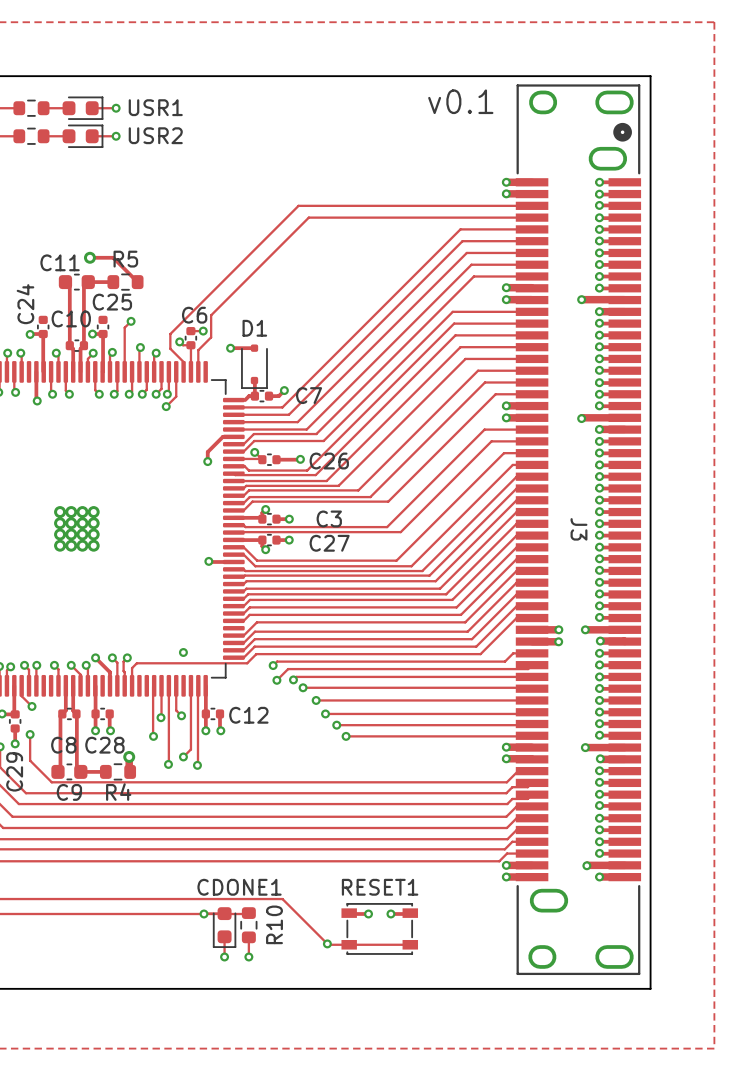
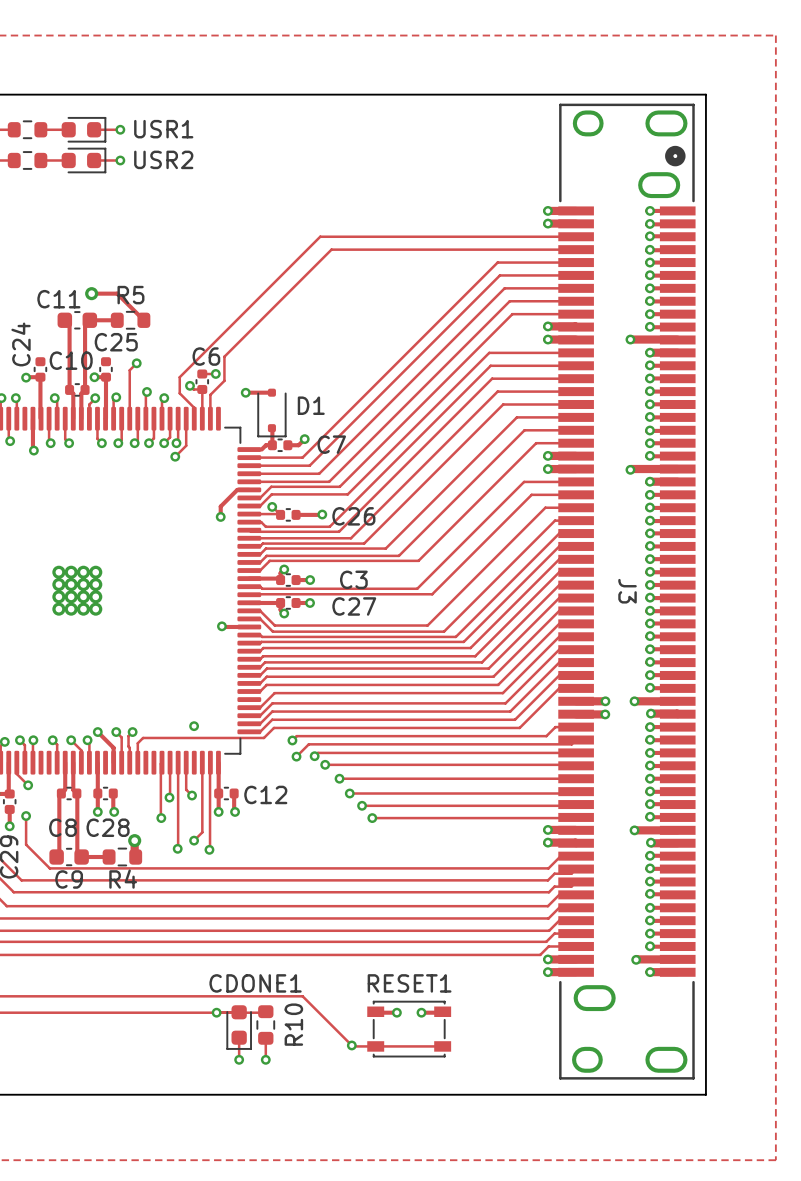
text: v0.1 (460, 101) -> none
D1 name position: D1 (254, 328) -> D1 (311, 405)

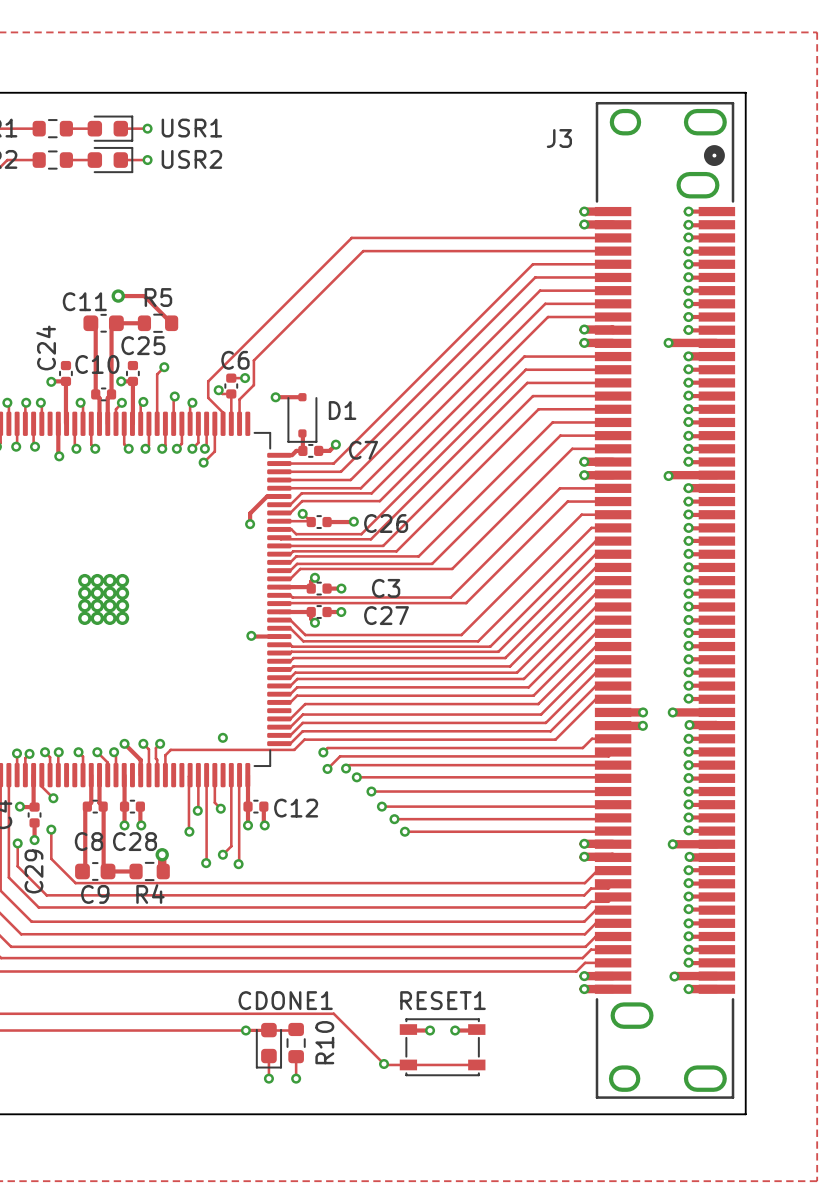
J3 name rotation: 0° (627, 591) -> 90° counterclockwise (559, 138)
J3 name position: J3 (627, 591) -> J3 (559, 138)

